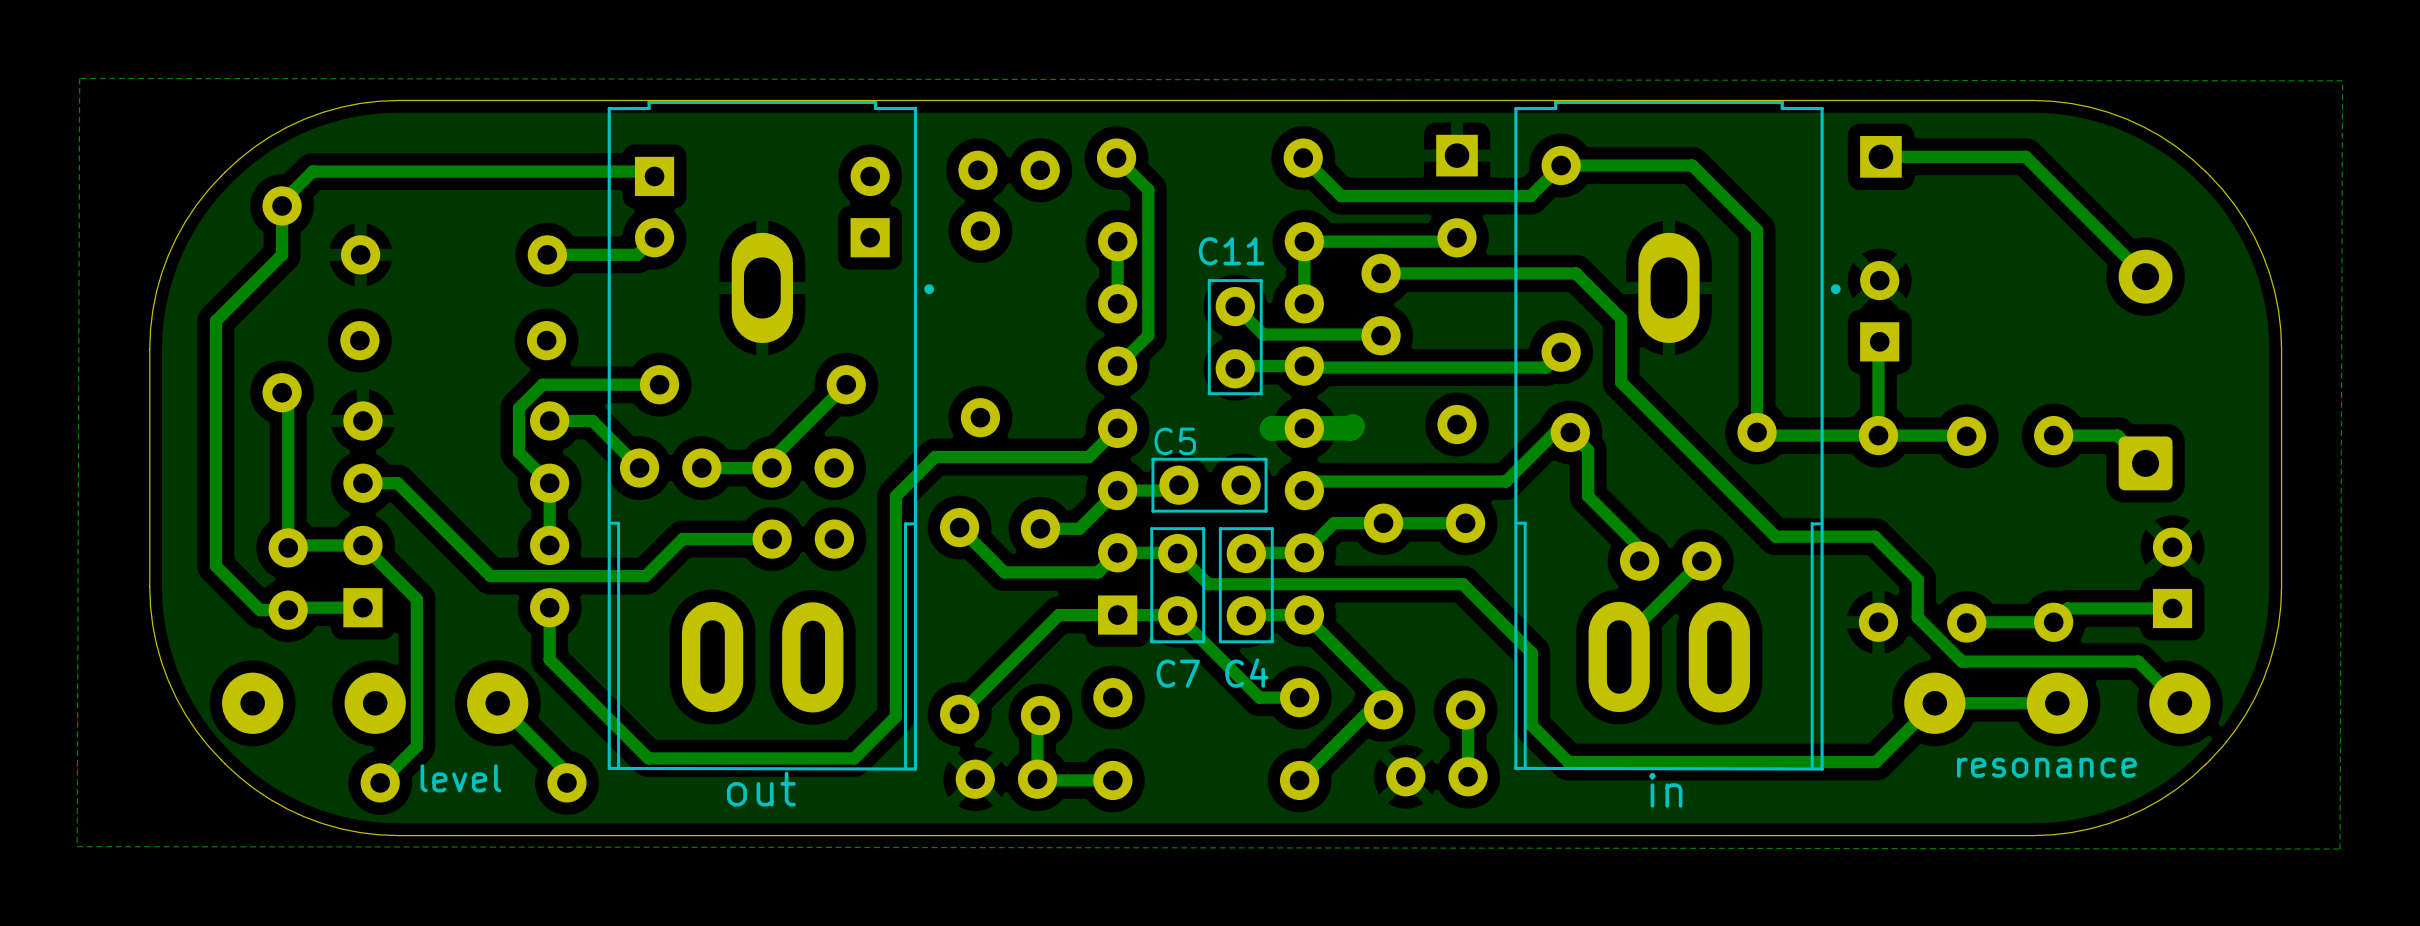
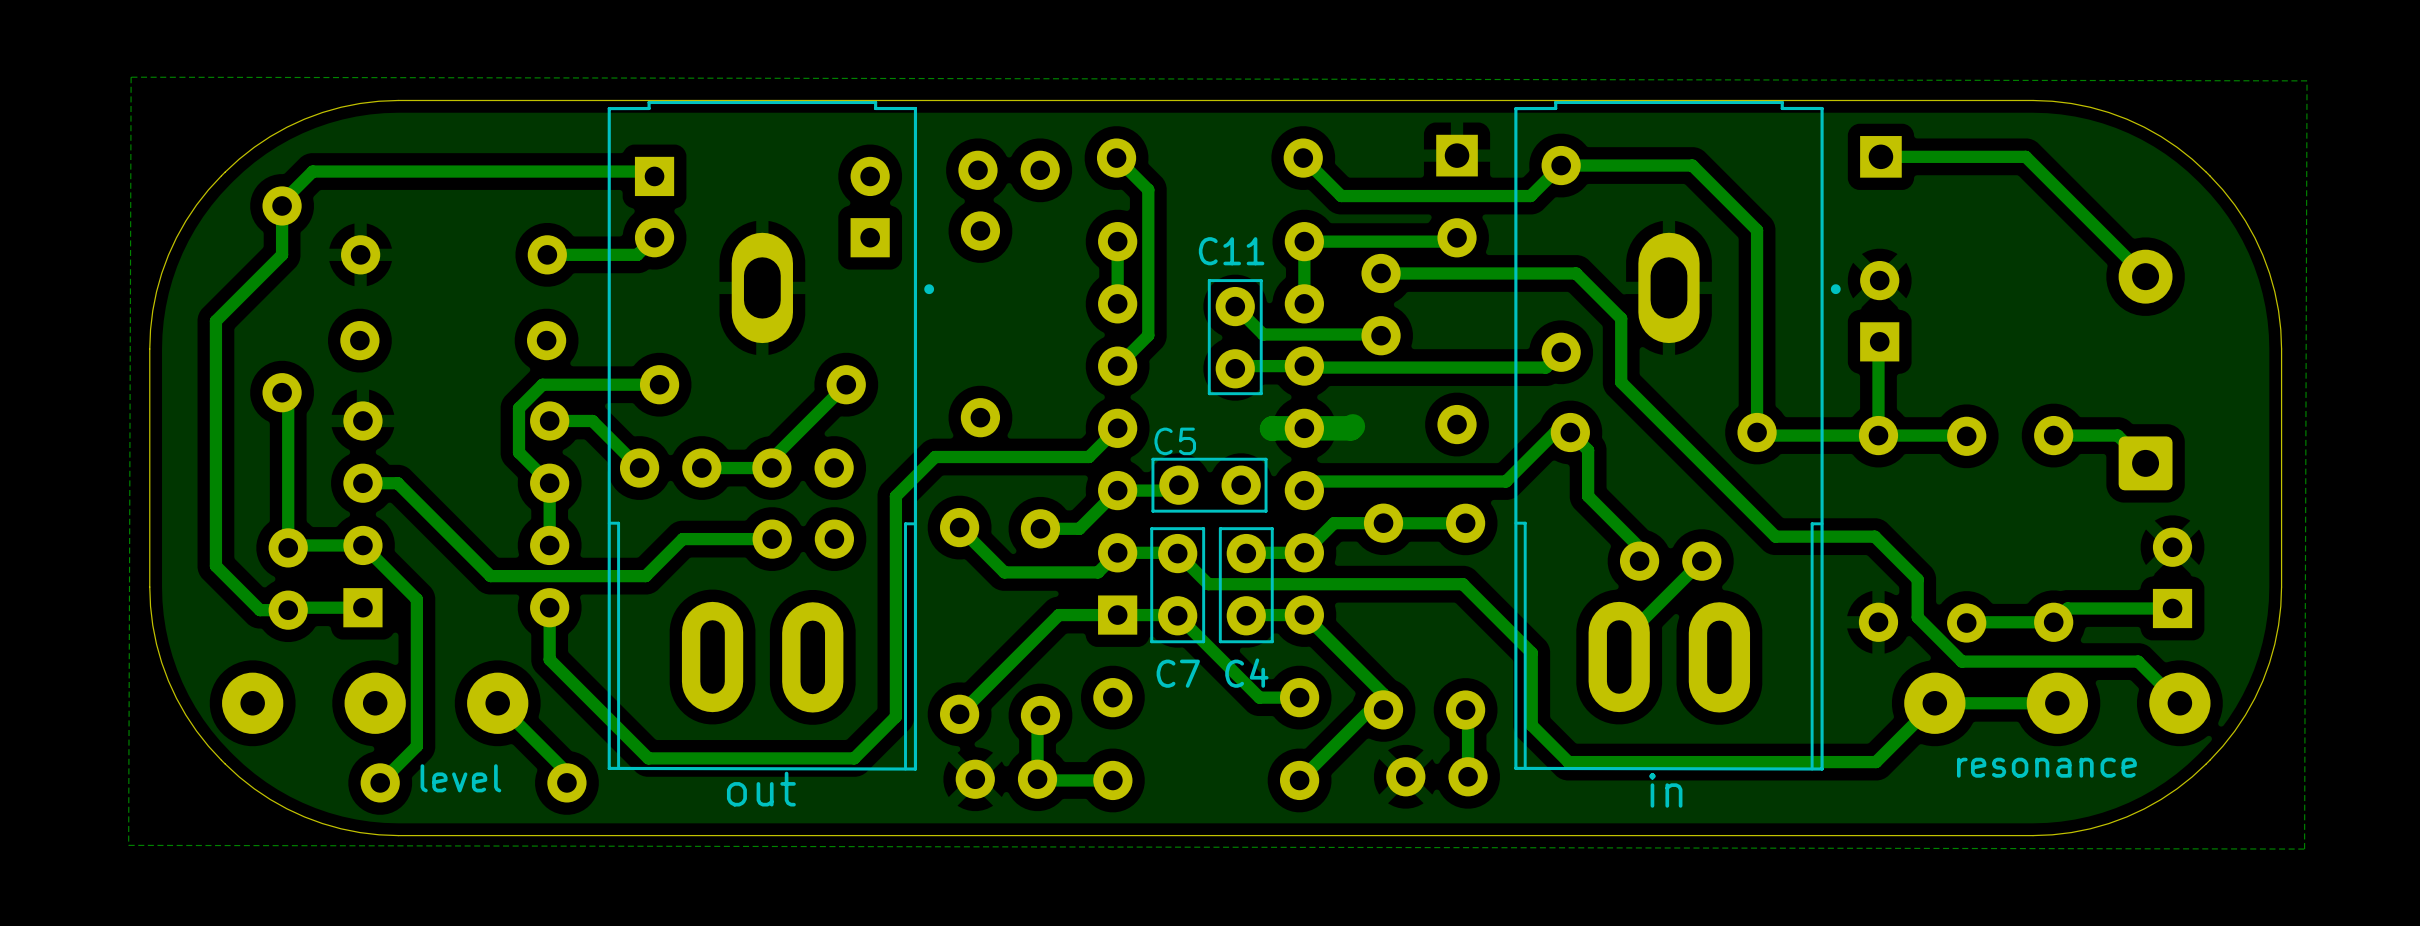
zone outline: (79, 78) (2342, 80) (2340, 849) (77, 846) (79, 78) -> (131, 77) (2307, 80) (2304, 849) (128, 845) (131, 77)

